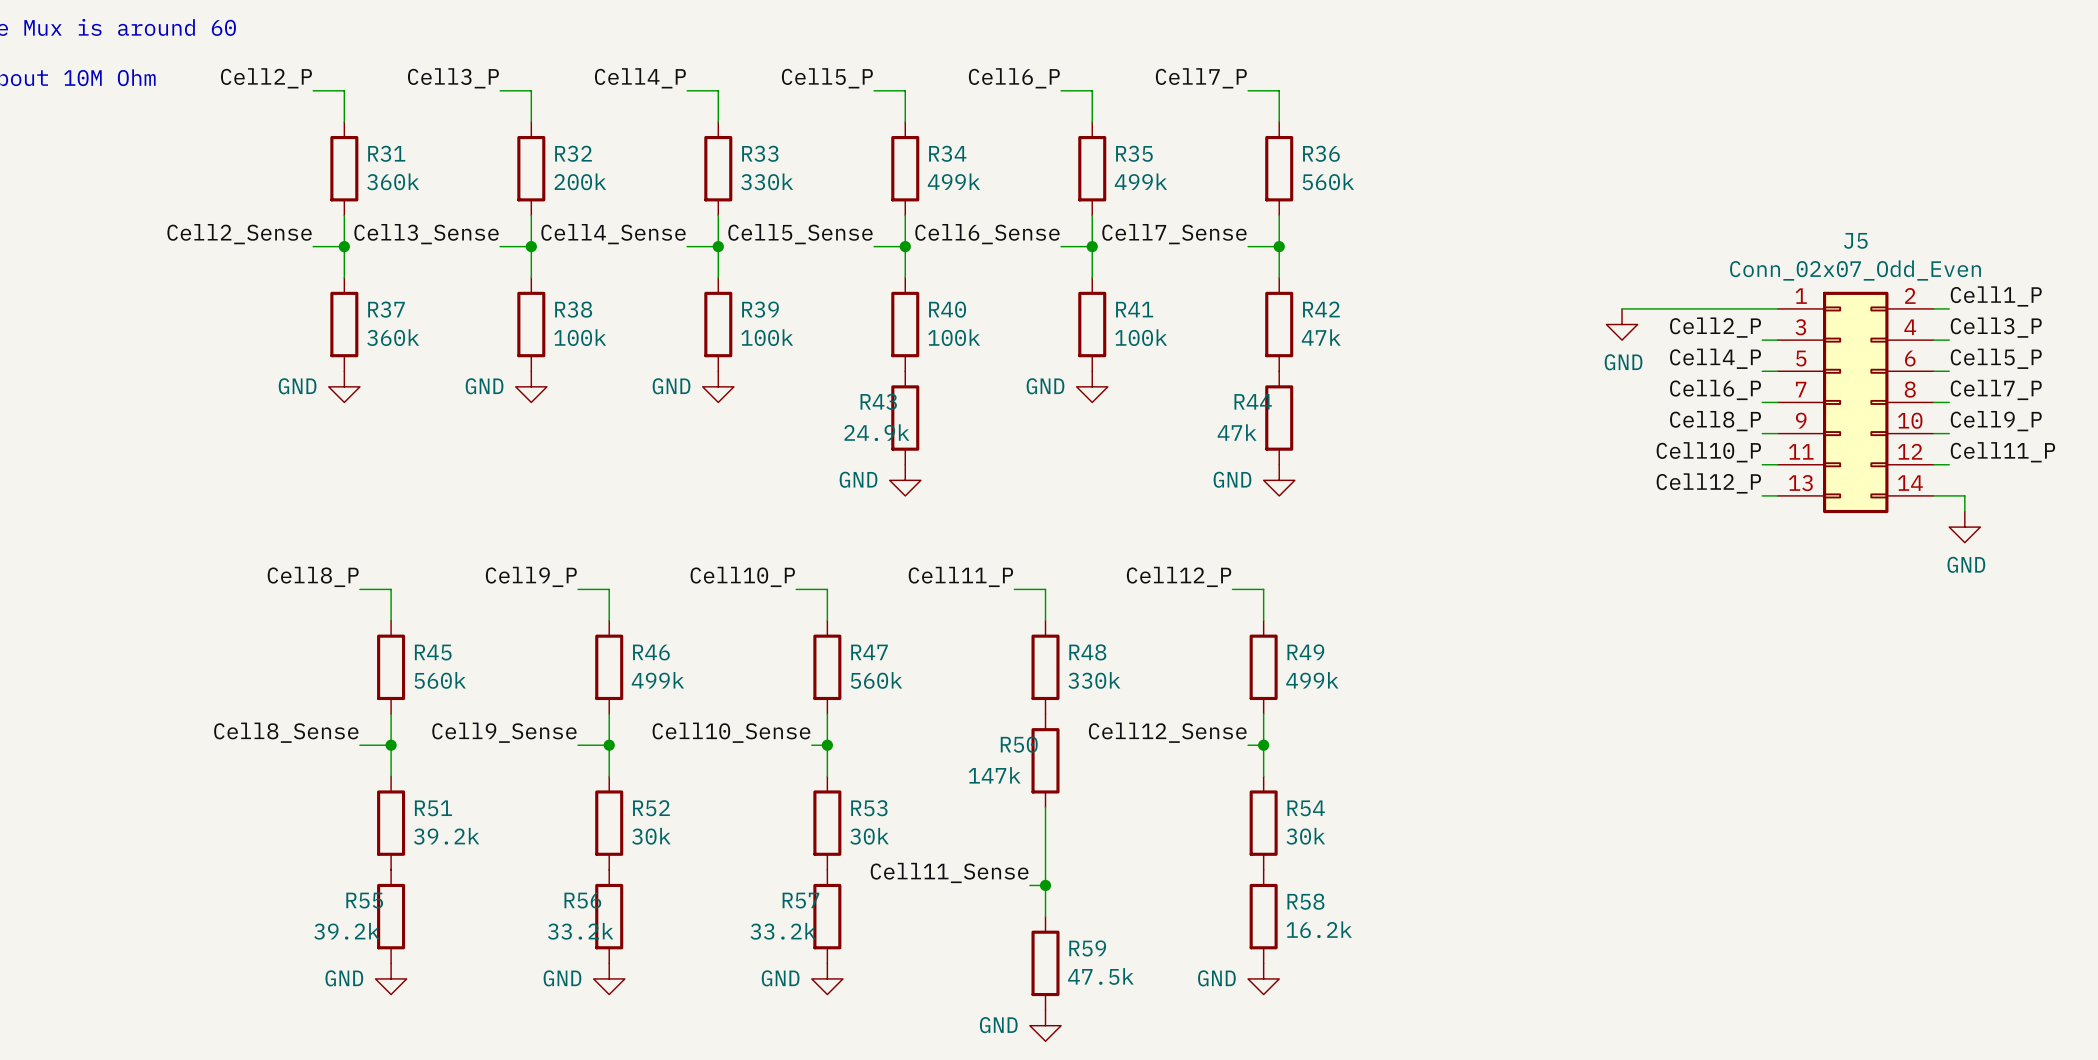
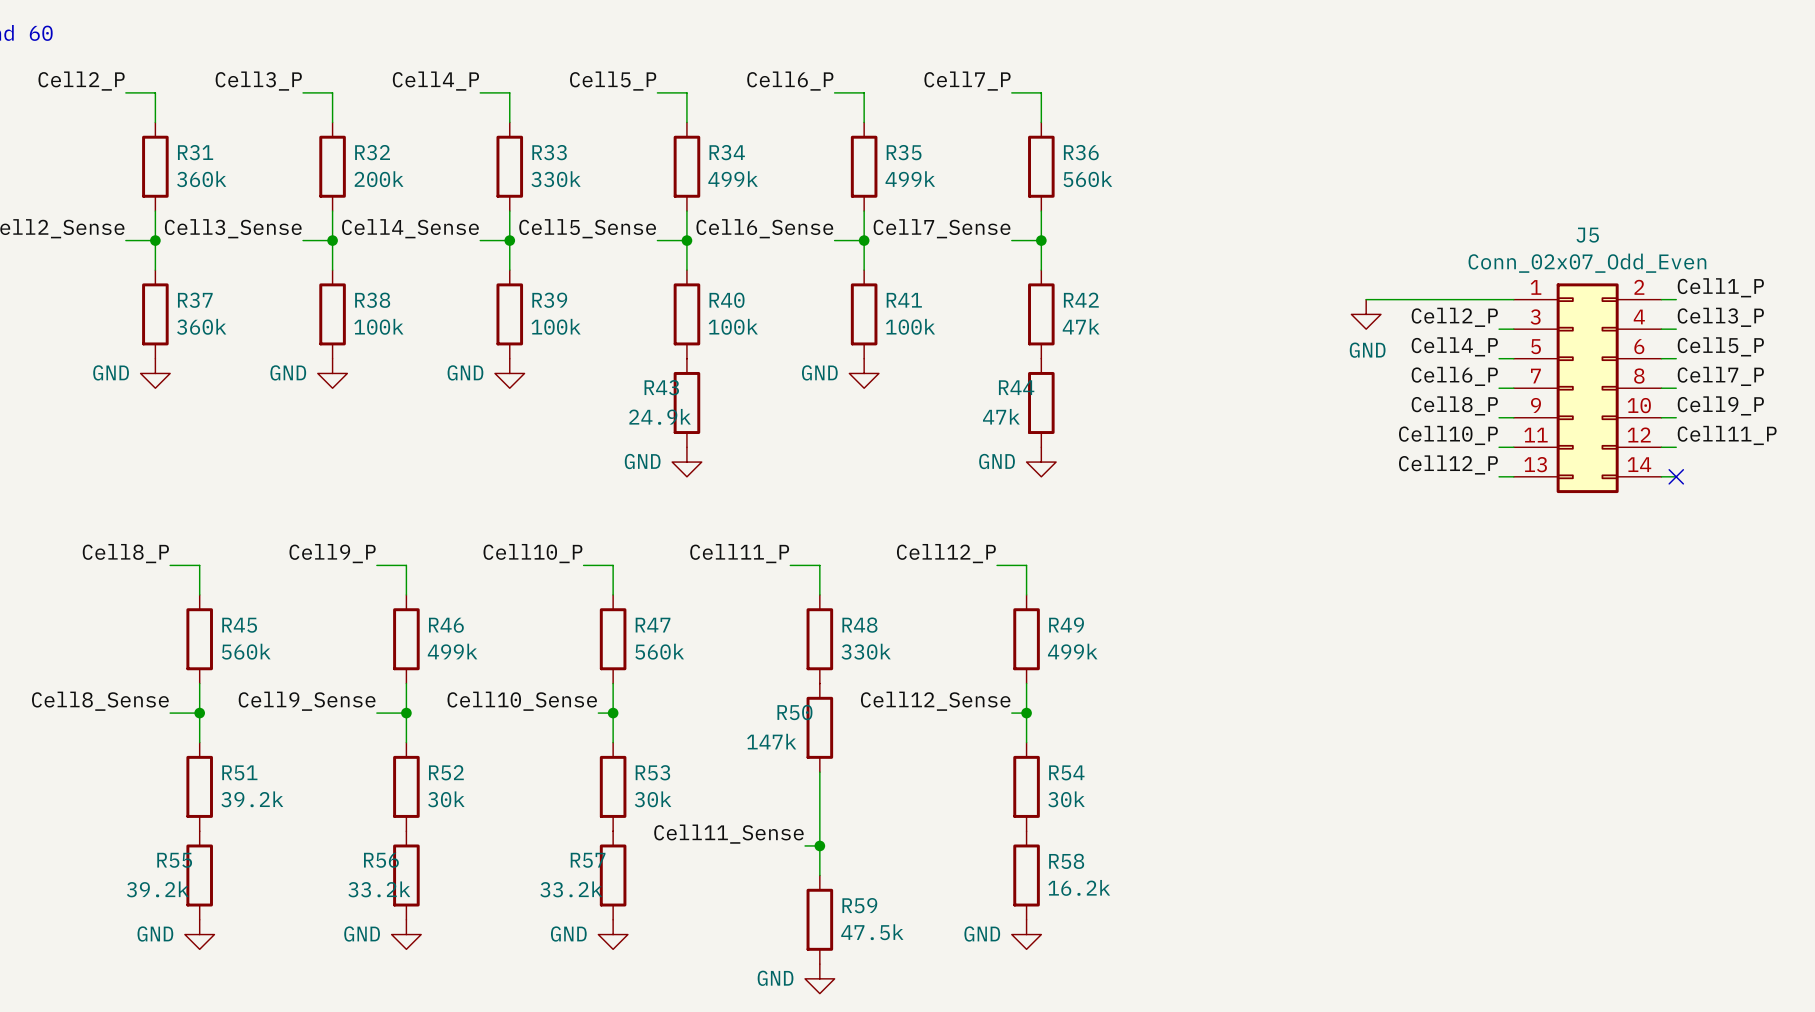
wire: (1949, 495) (1964, 495) (1964, 511) -> none
no-connect mark: none -> (1676, 476)
power symbol: GND (1964, 527) -> none

